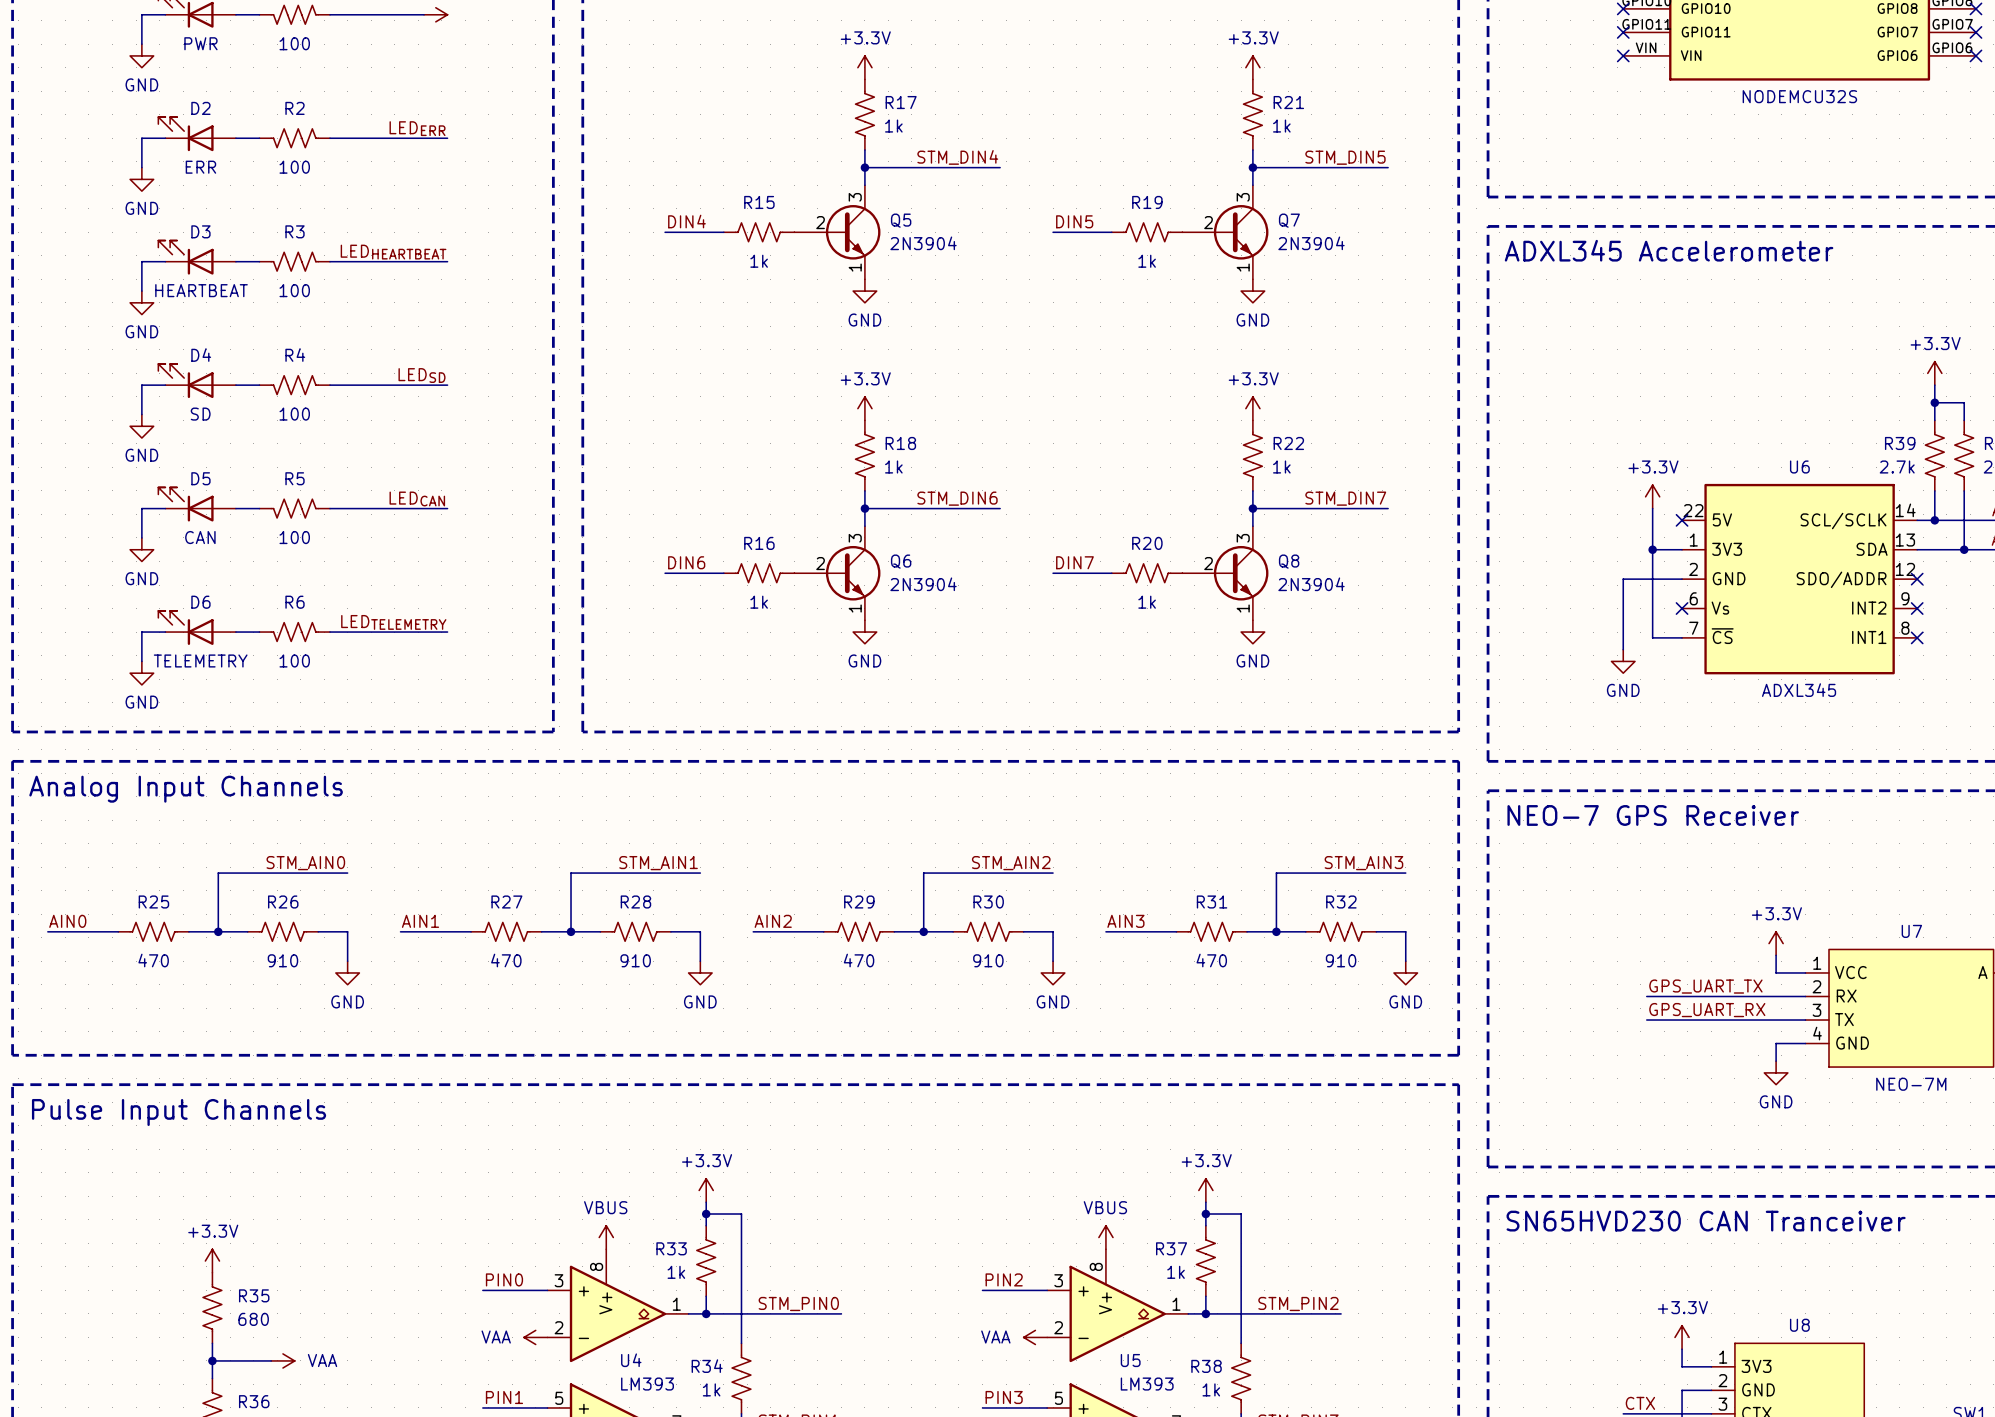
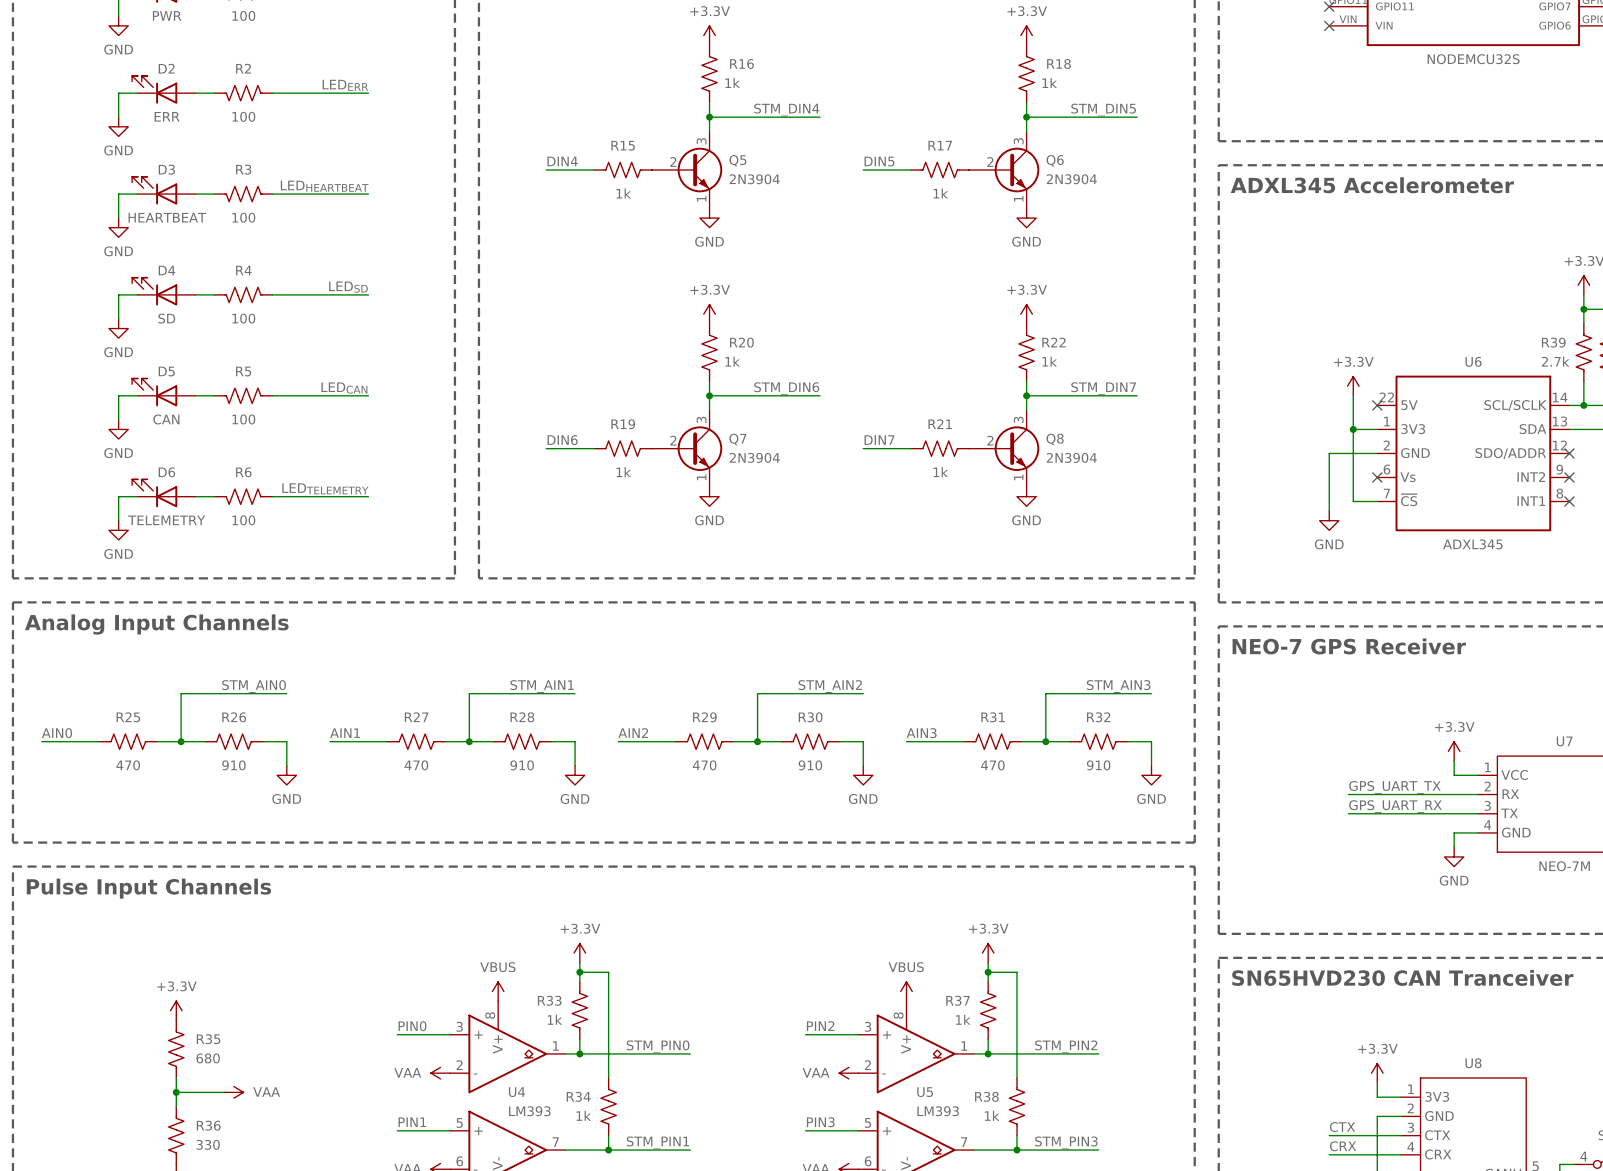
R17 name: R17 (901, 102) -> R16 (741, 63)
R21 name: R21 (1288, 102) -> R18 (1058, 63)
R19 name: R19 (1147, 202) -> R17 (940, 145)
Q7 name: Q7 (1289, 220) -> Q6 (1055, 160)
R18 name: R18 (900, 443) -> R20 (741, 342)
R16 name: R16 (759, 543) -> R19 (623, 424)
R20 name: R20 (1147, 543) -> R21 (940, 424)
Q6 name: Q6 (901, 561) -> Q7 (737, 439)

